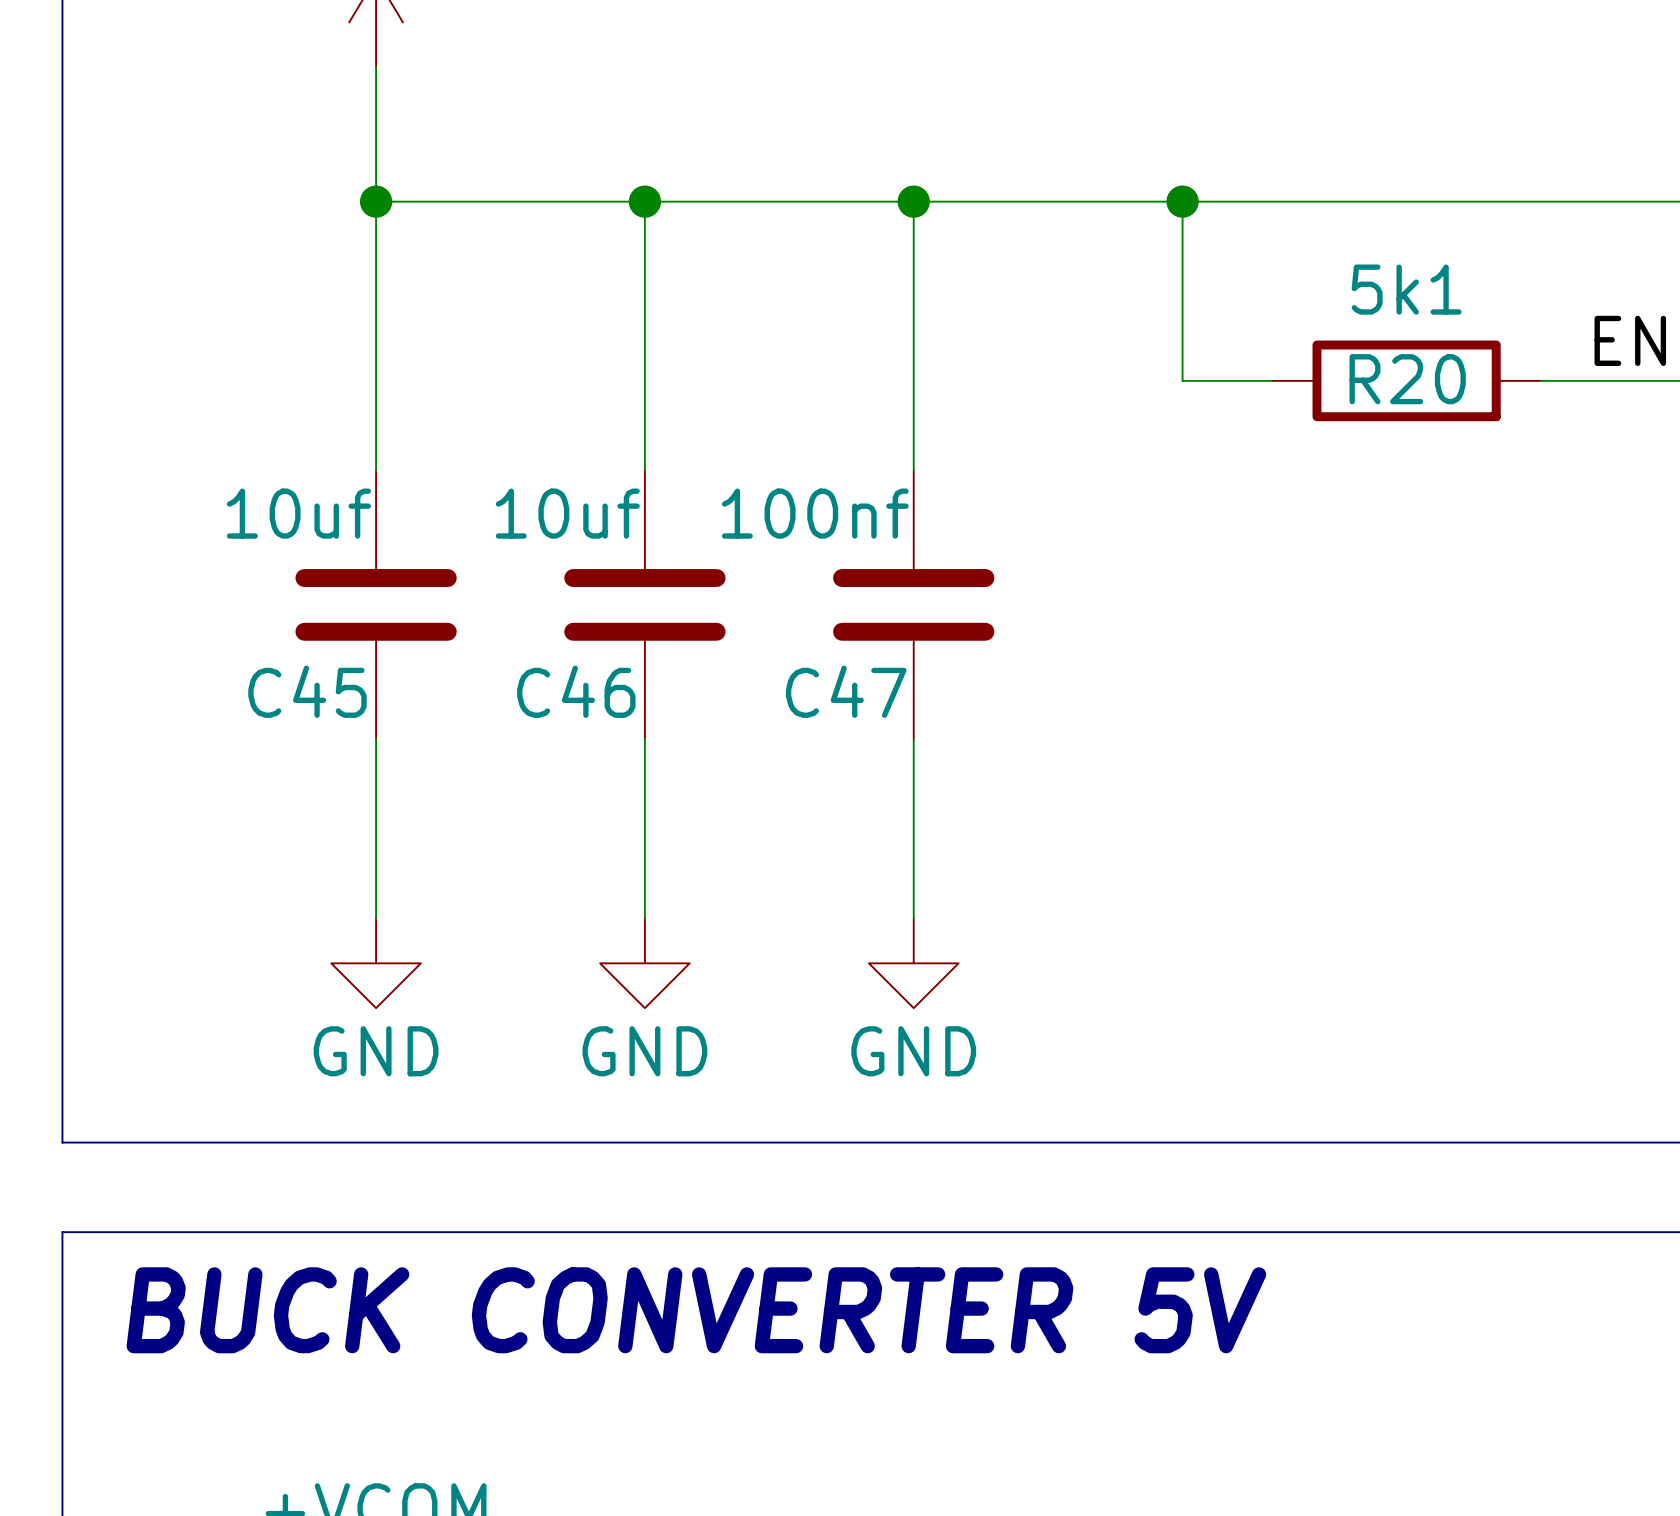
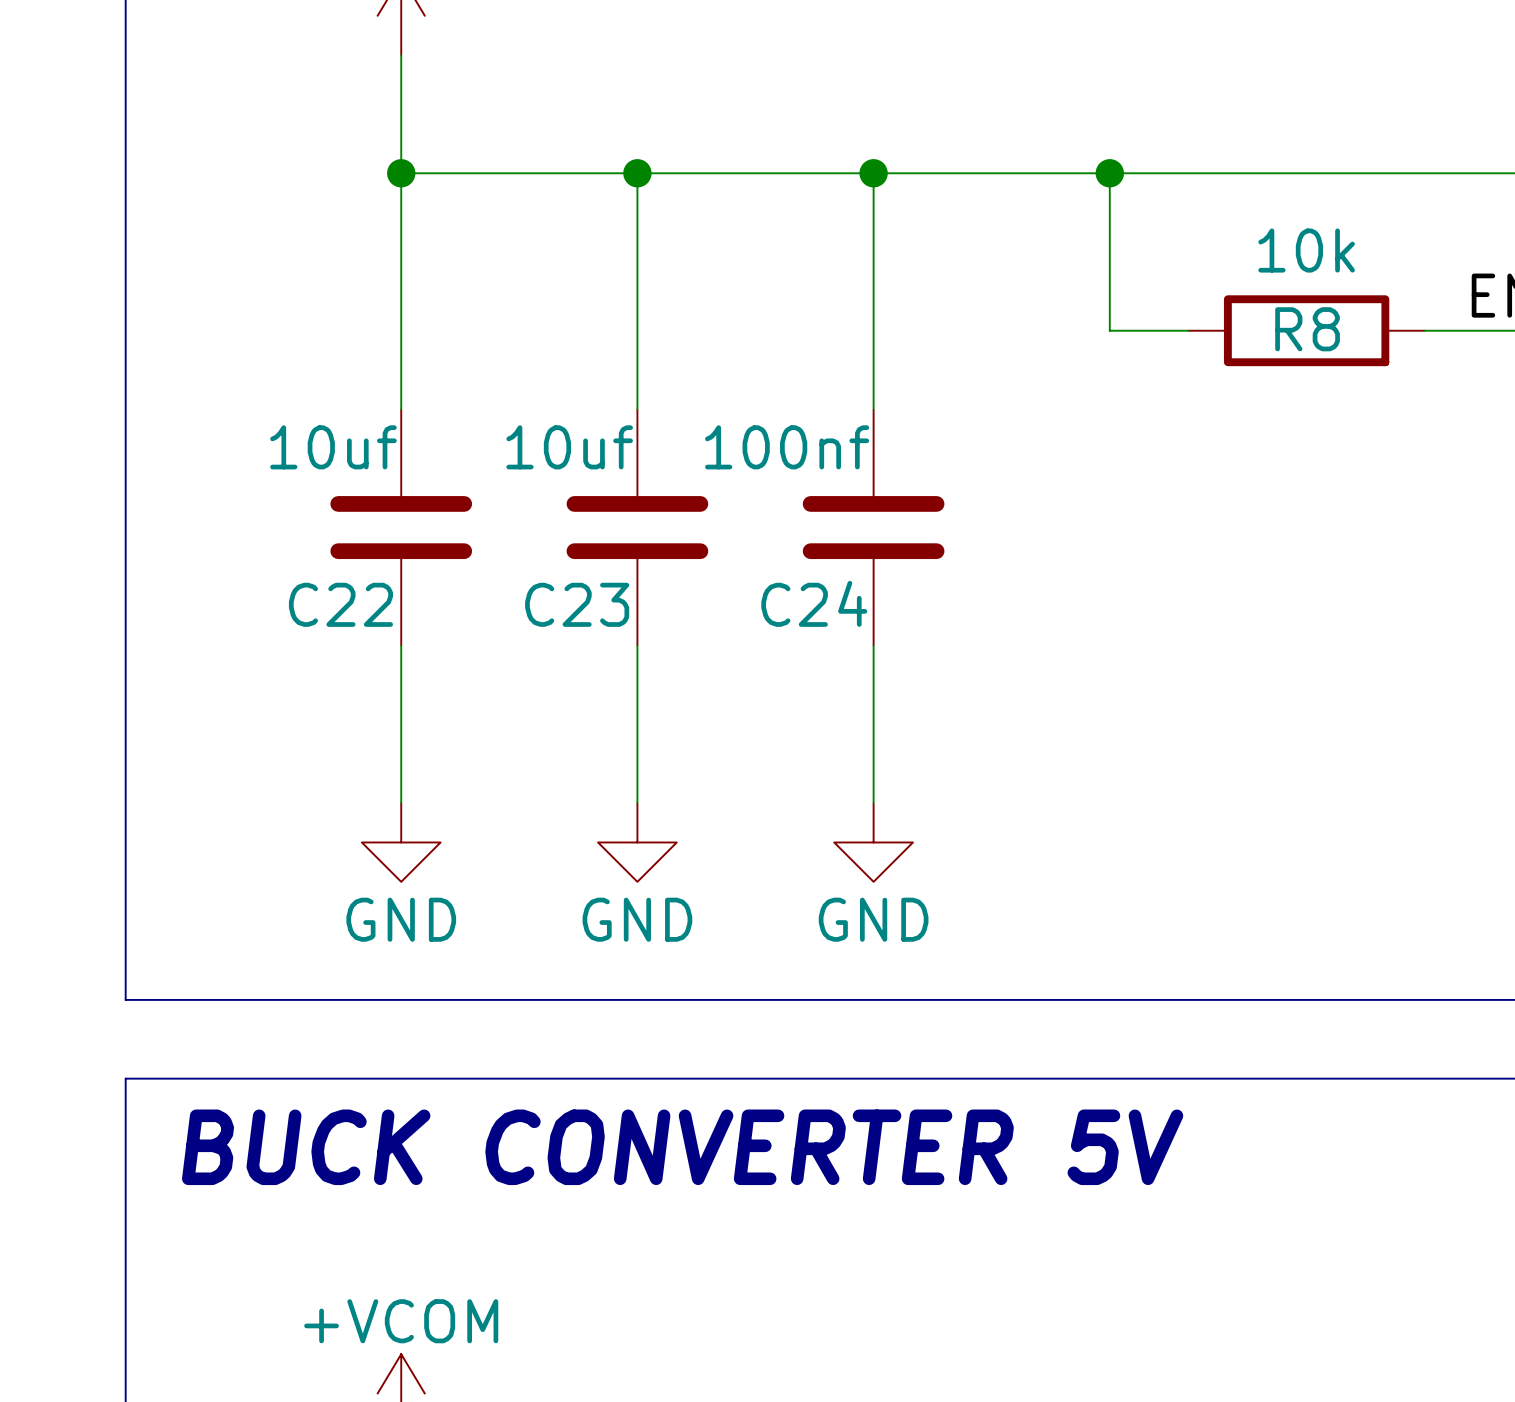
R20 value: 5k1 (1406, 289) -> 10k (1306, 250)
R20 name: R20 (1407, 379) -> R8 (1307, 329)
C45 name: C45 (307, 691) -> C22 (340, 604)
C46 name: C46 (576, 691) -> C23 (577, 604)
C47 name: C47 (846, 691) -> C24 (814, 603)

